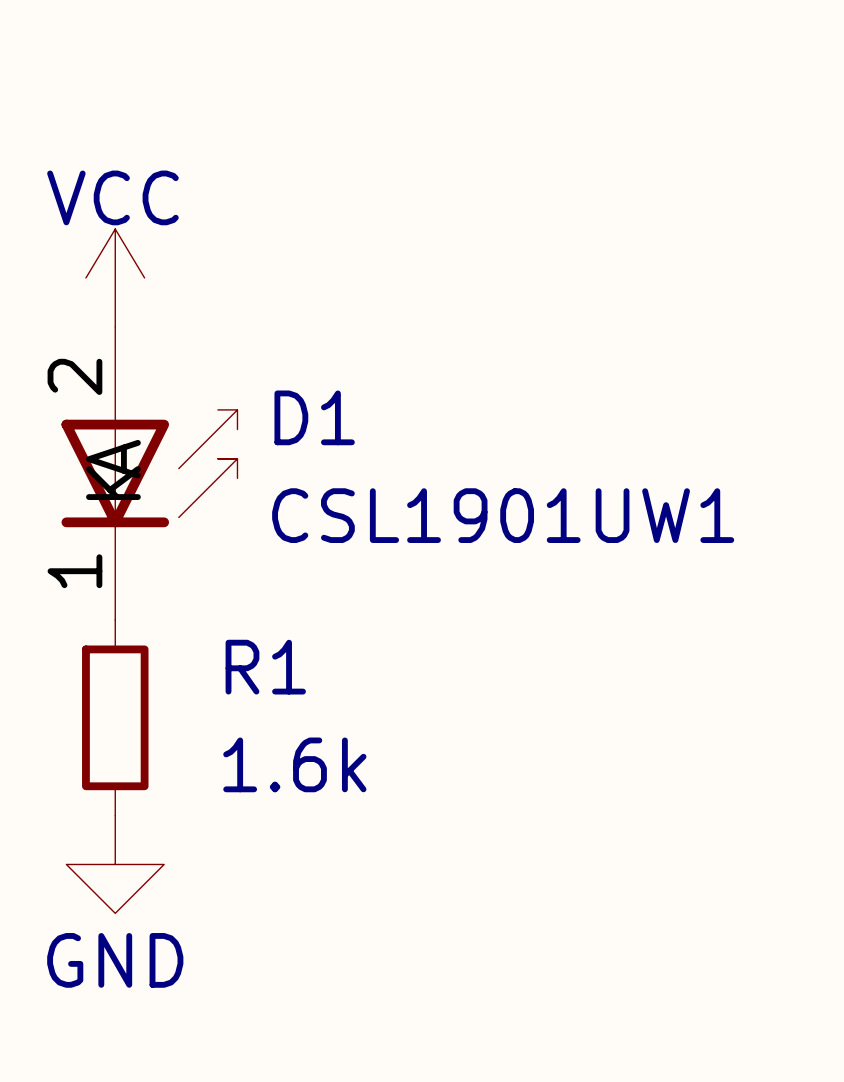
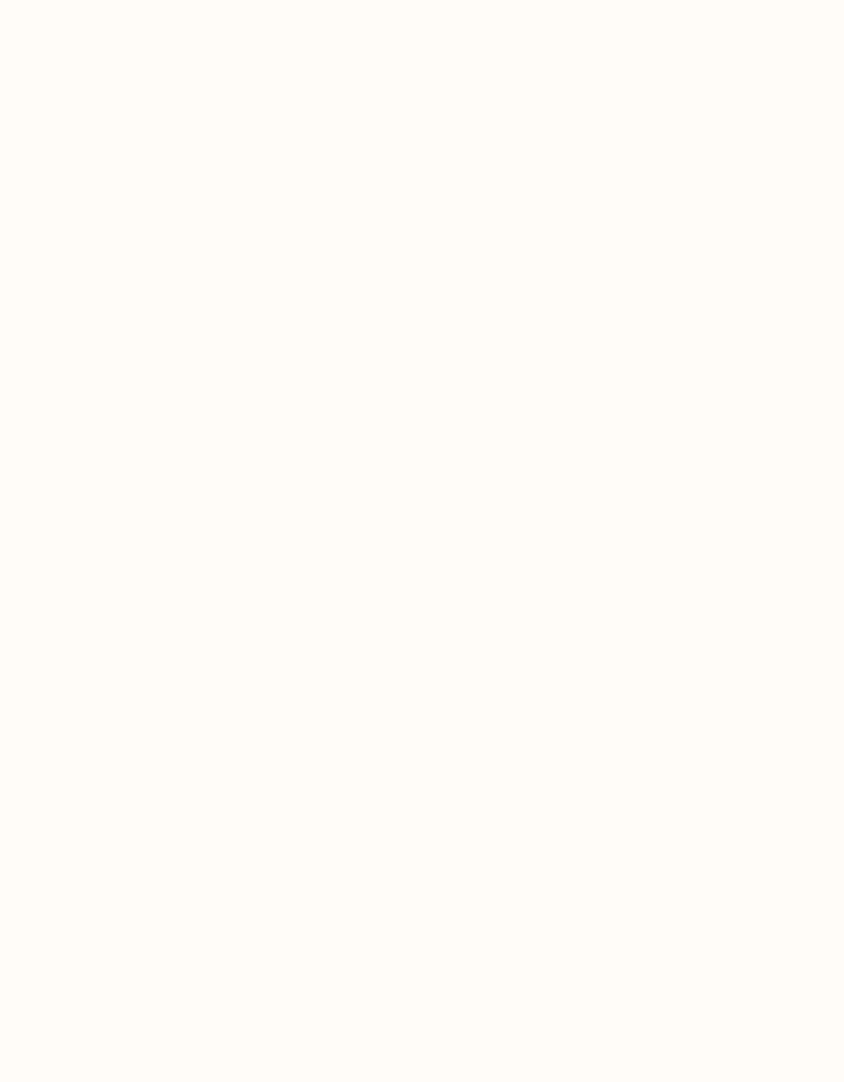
power symbol: VCC (115, 277) -> none
D1: CSL1901UW1 (149, 473) -> none
R1: 1.6k (115, 717) -> none
power symbol: GND (115, 864) -> none

